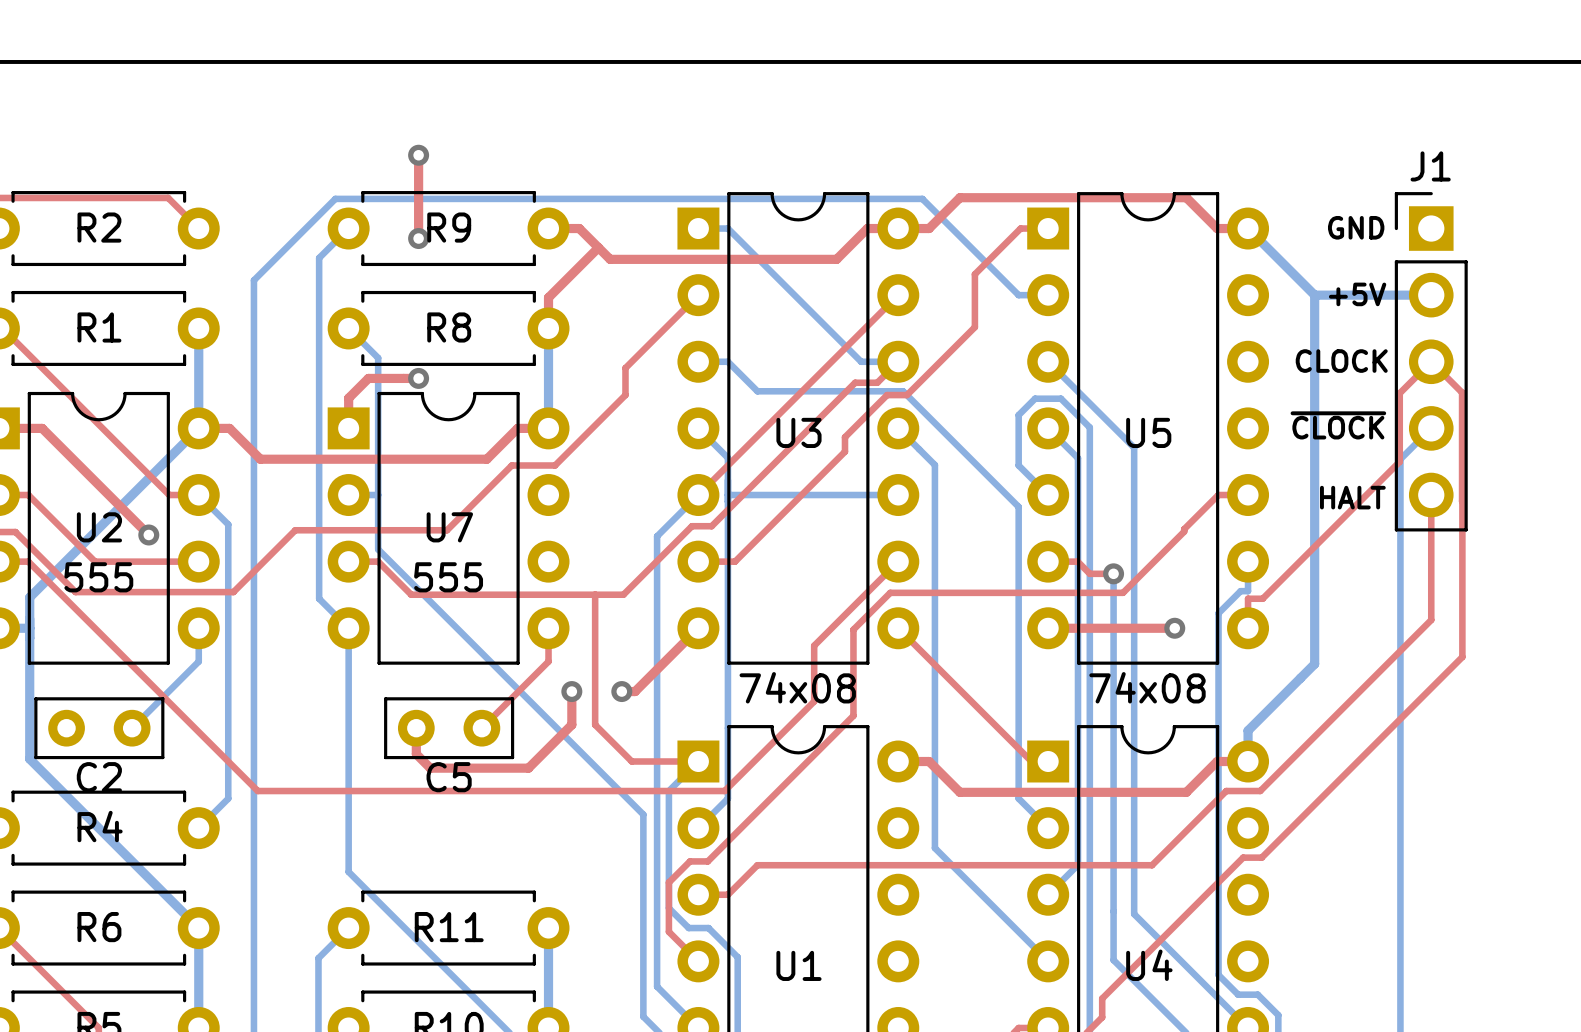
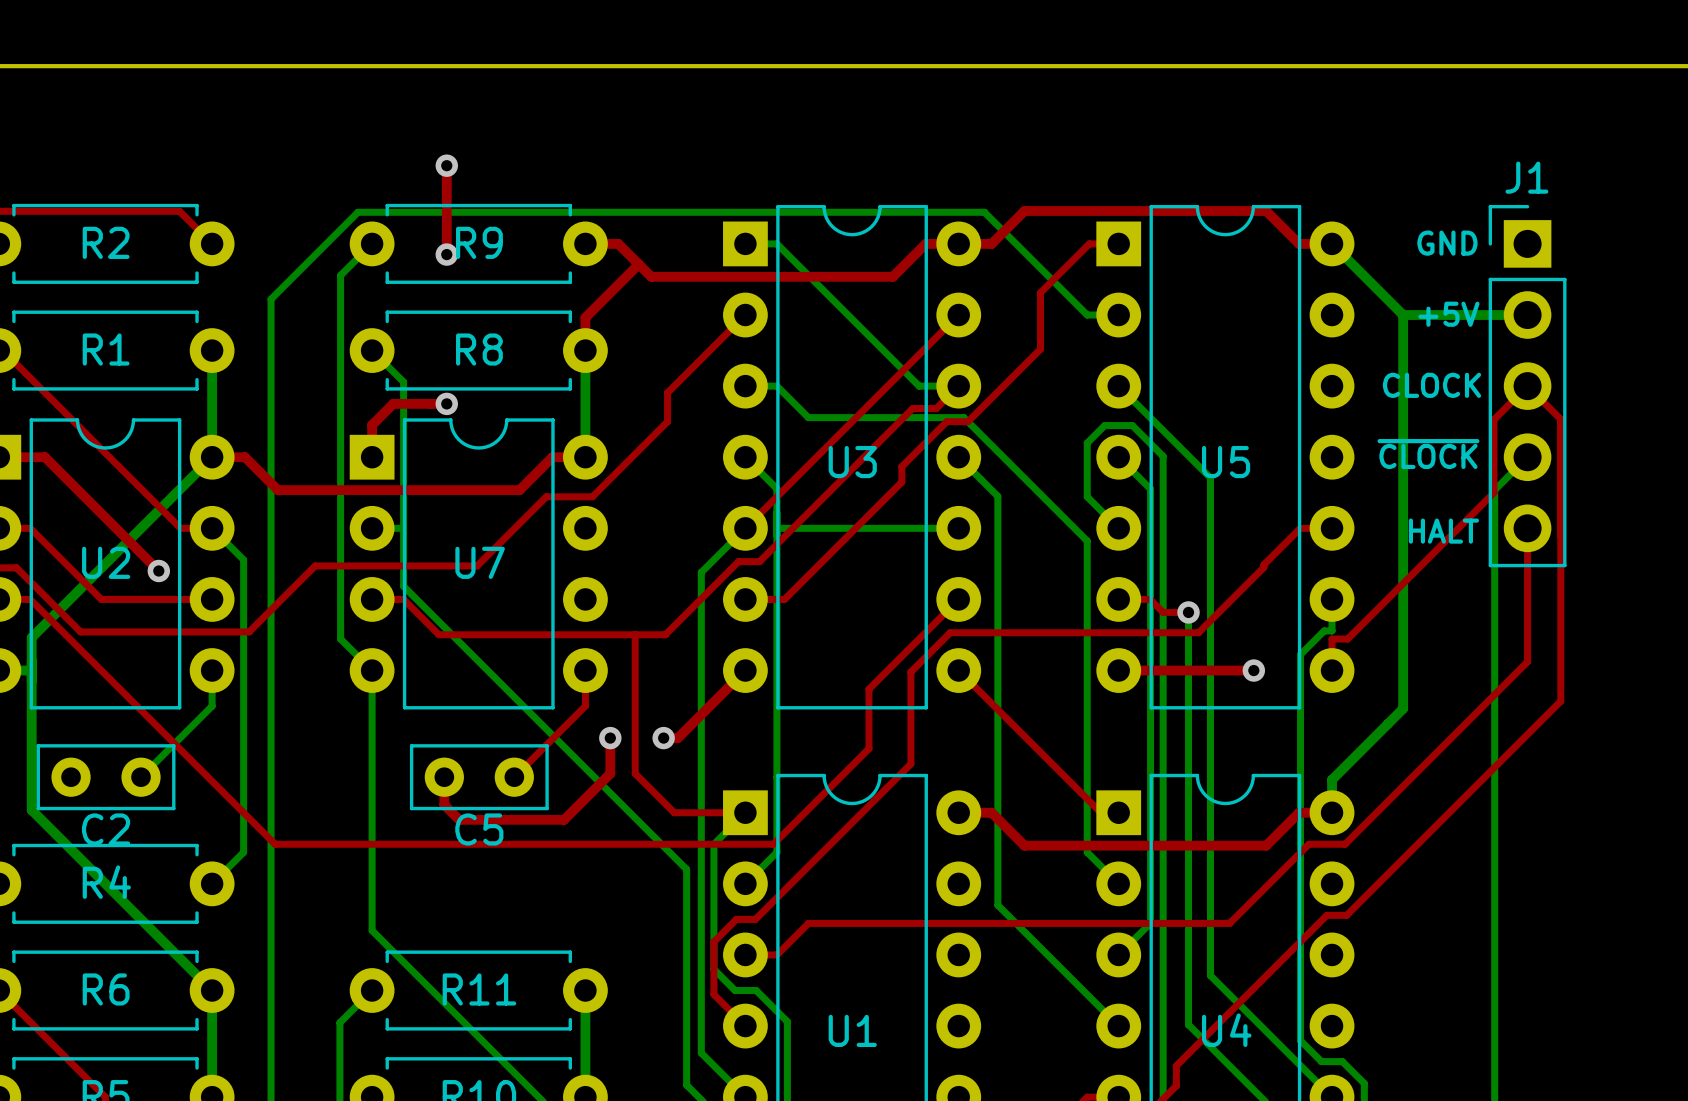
U2 value: 555 (98, 577) -> none
U7 value: 555 (448, 577) -> none
U3 value: 74x08 (797, 687) -> none
U5 value: 74x08 (1147, 687) -> none

